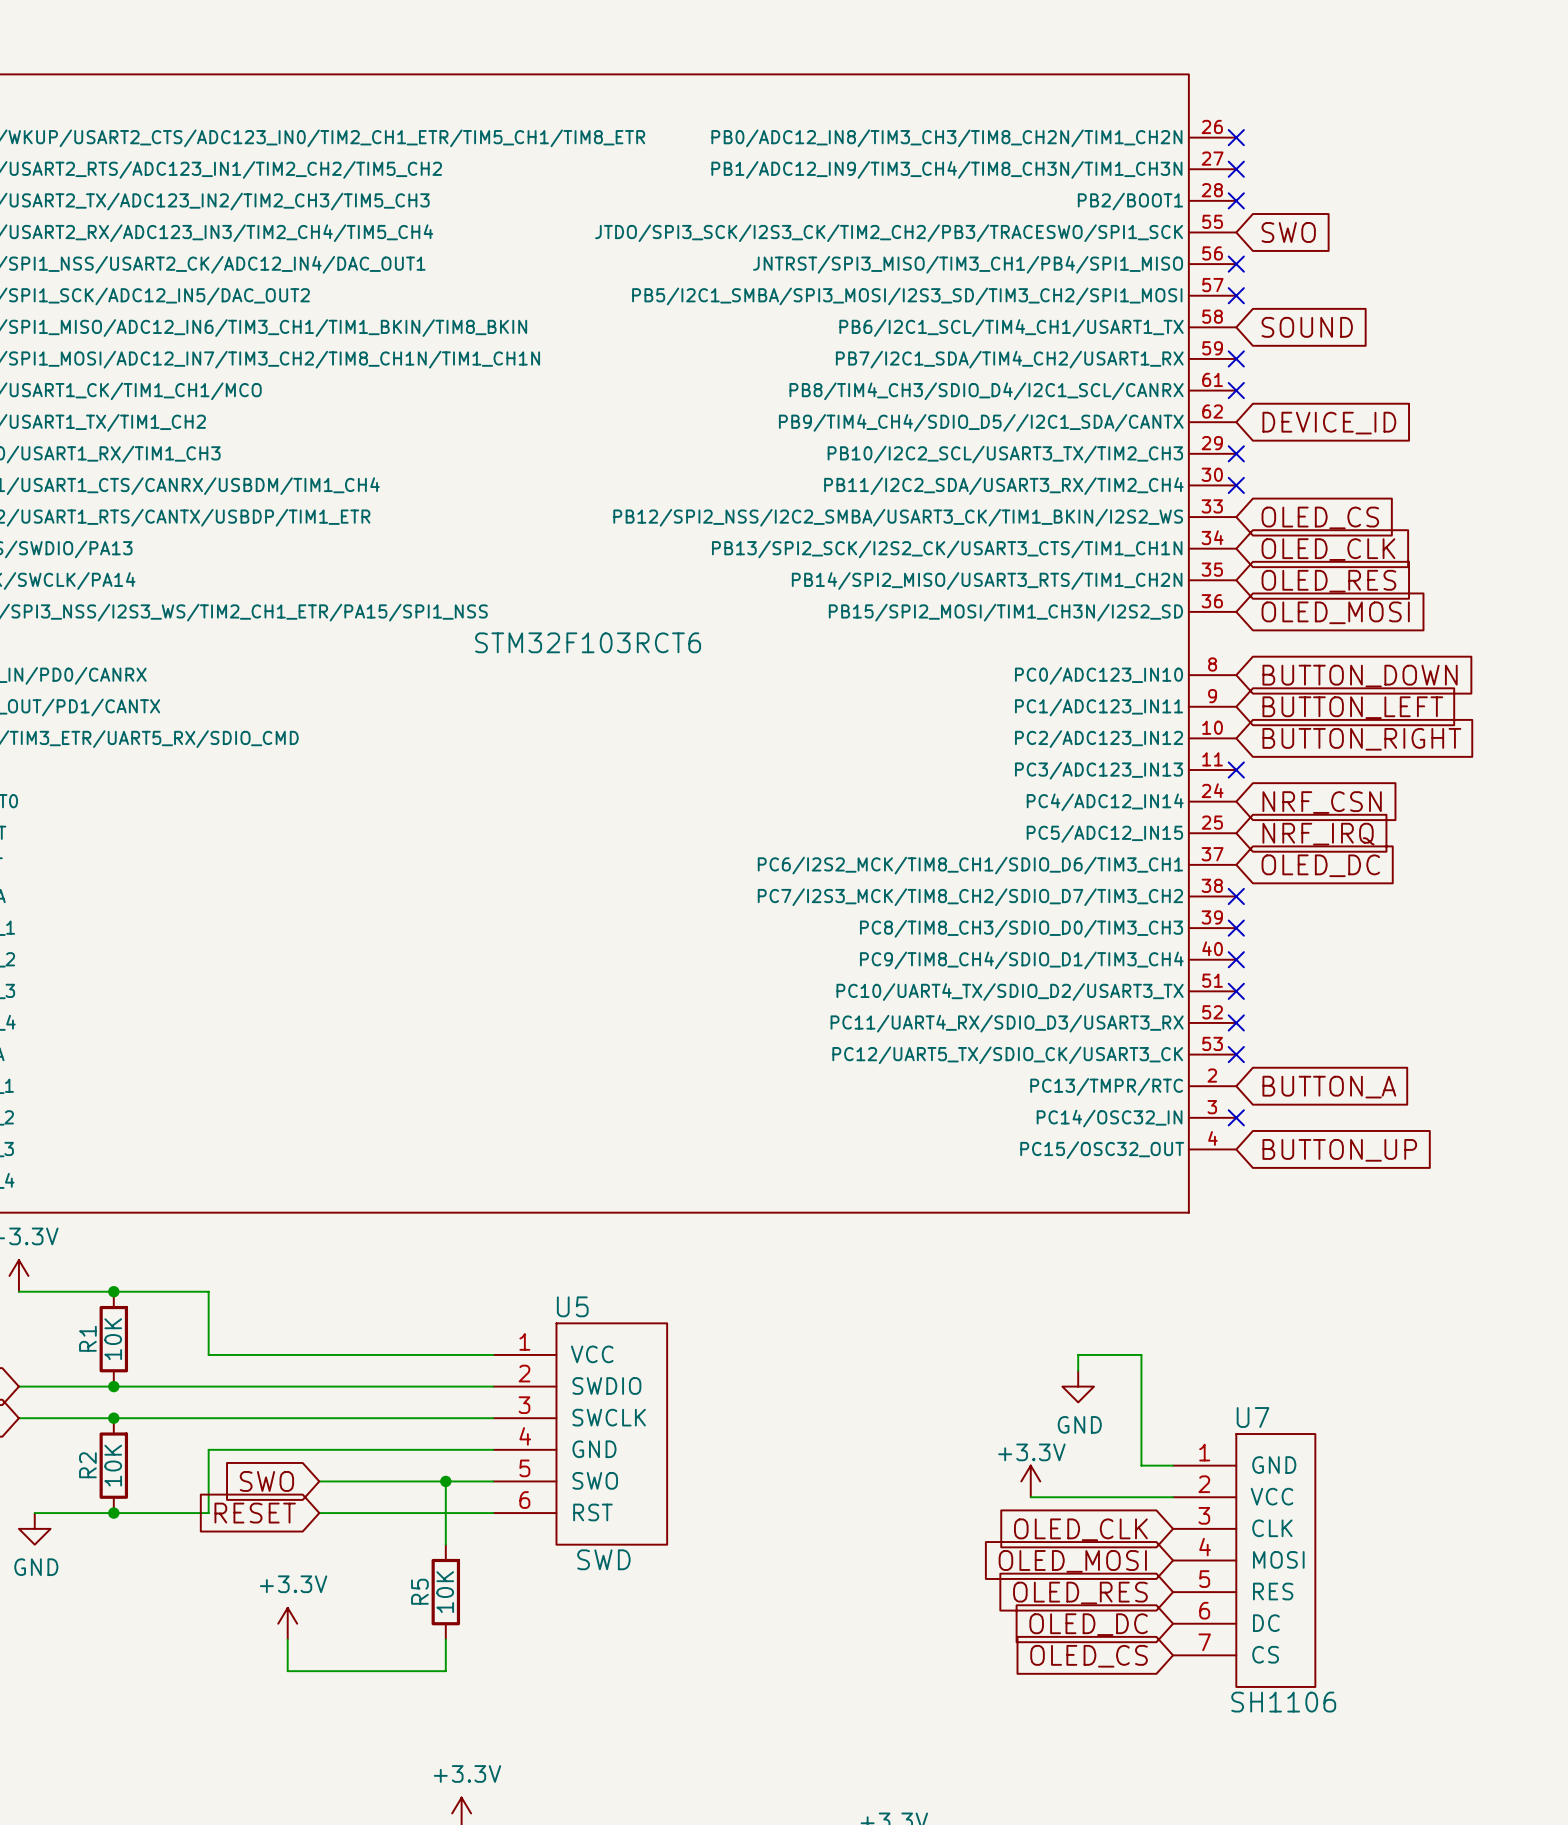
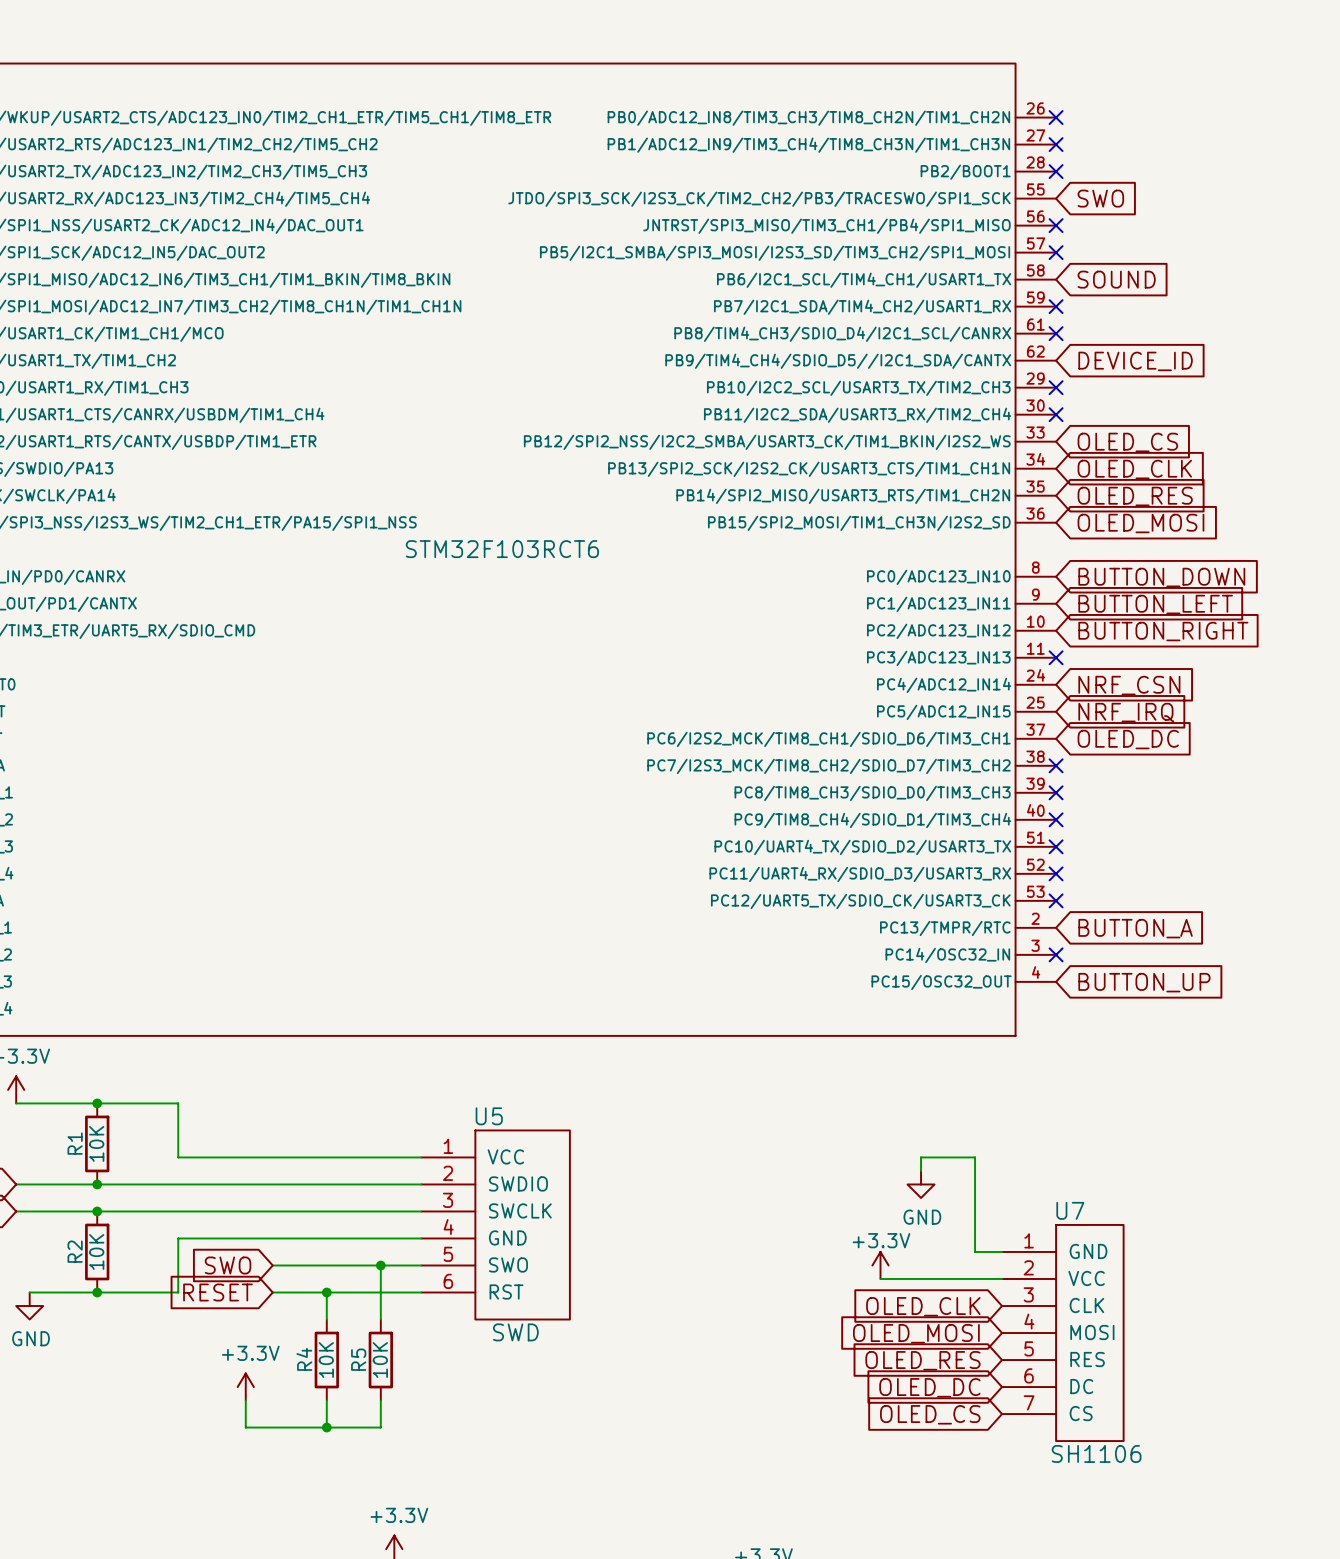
wire: none -> (326, 1292) (326, 1319)
junction: none -> (326, 1292)
R4: none -> 10K (326, 1360)
wire: none -> (326, 1400) (326, 1427)
junction: none -> (326, 1427)

